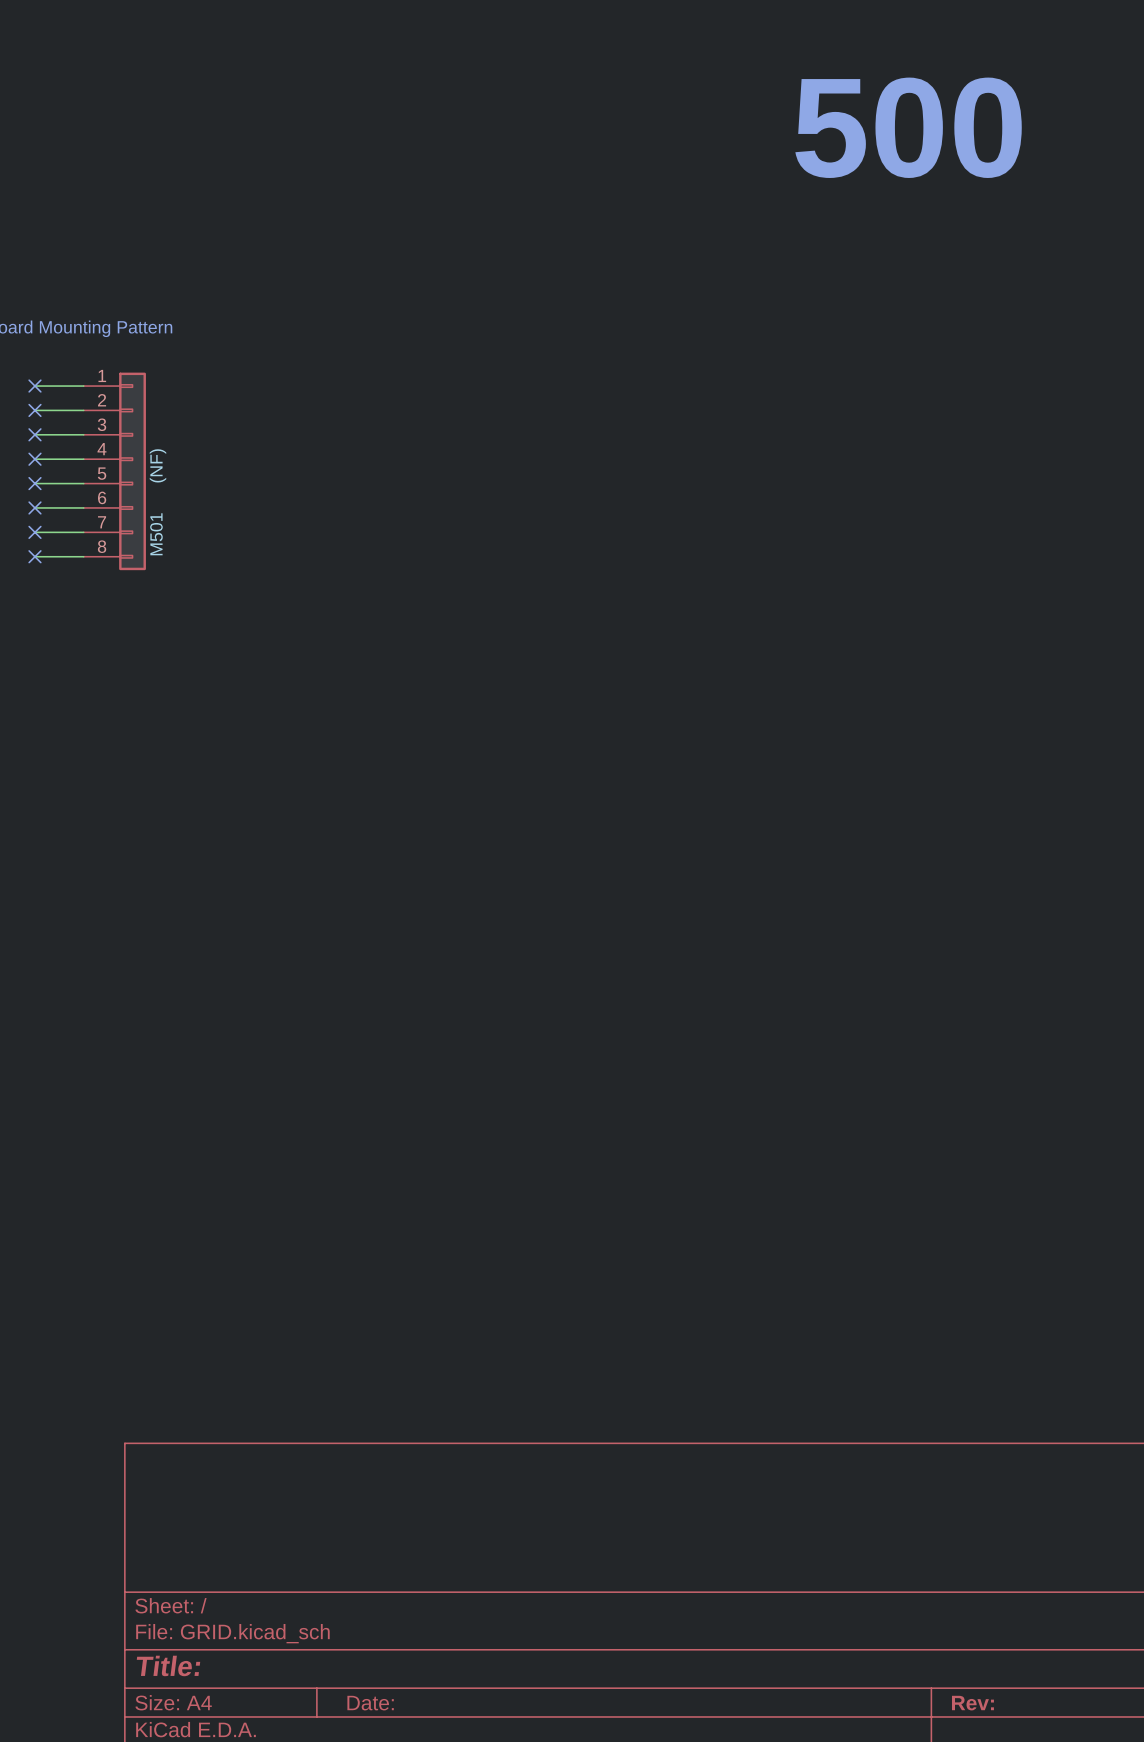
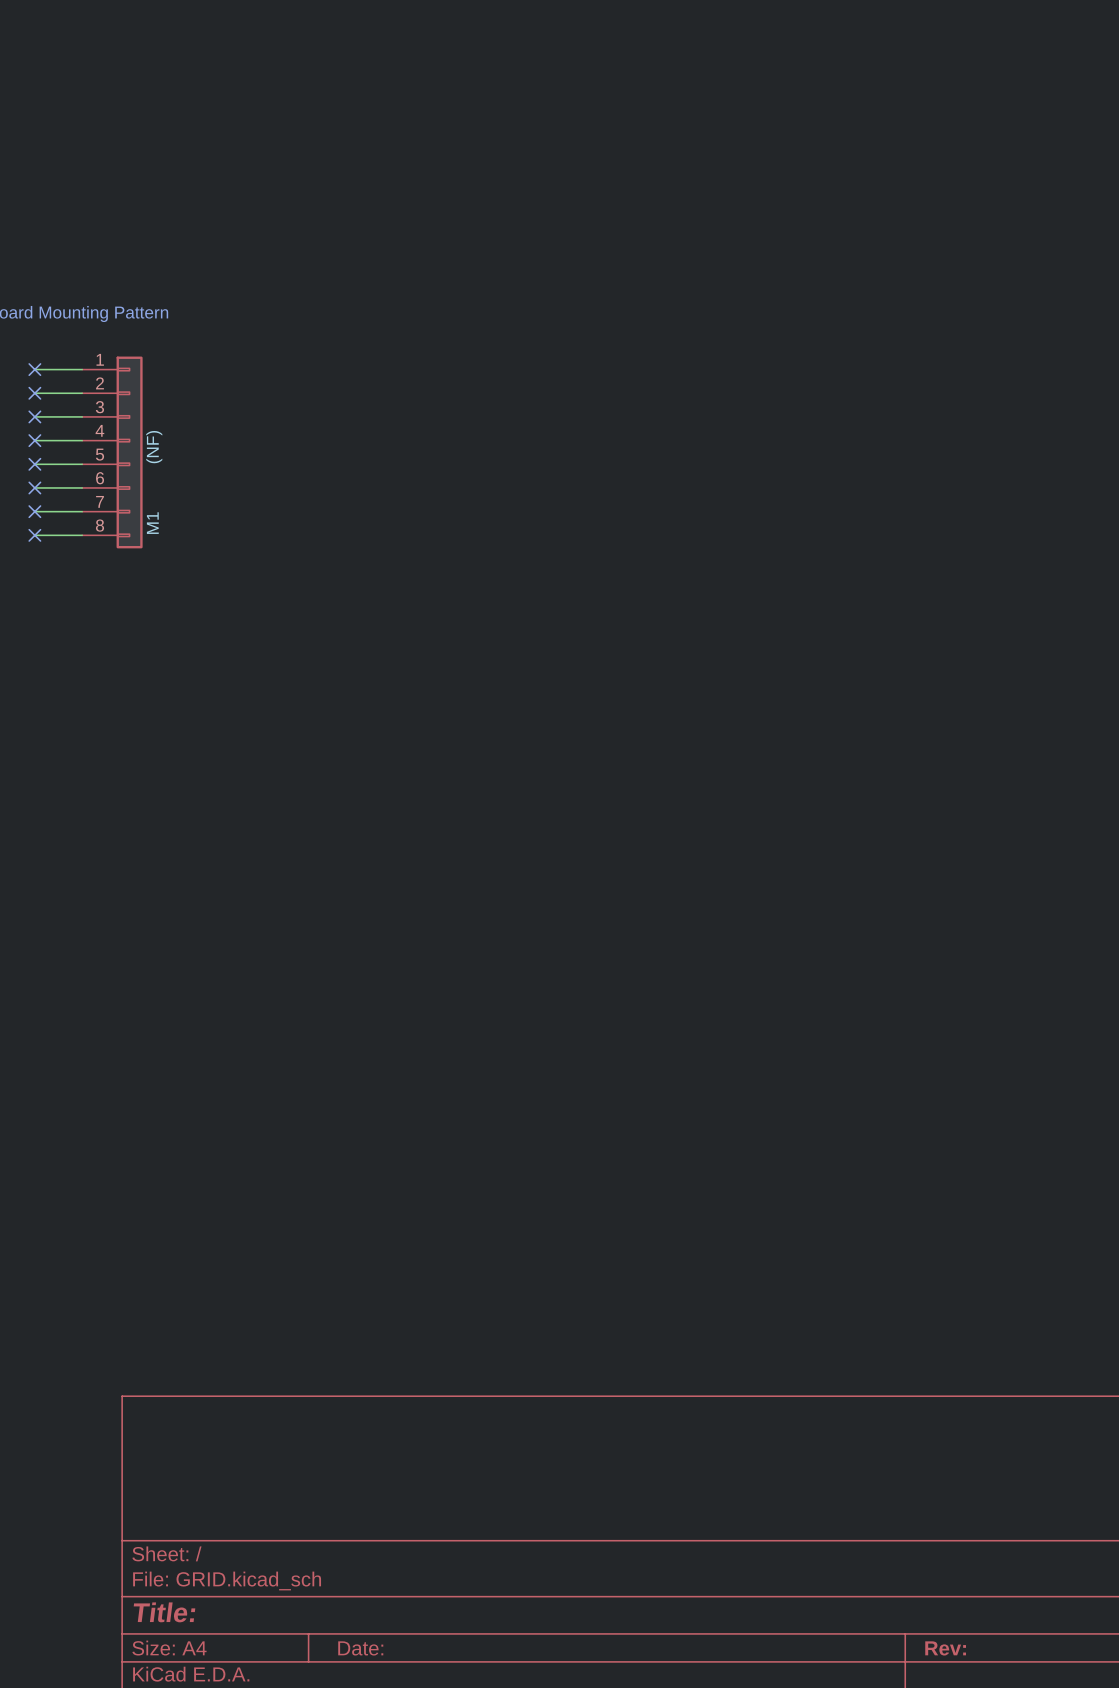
text: 500 (908, 127) -> none
M501 name: M501 (156, 534) -> M1 (152, 523)

